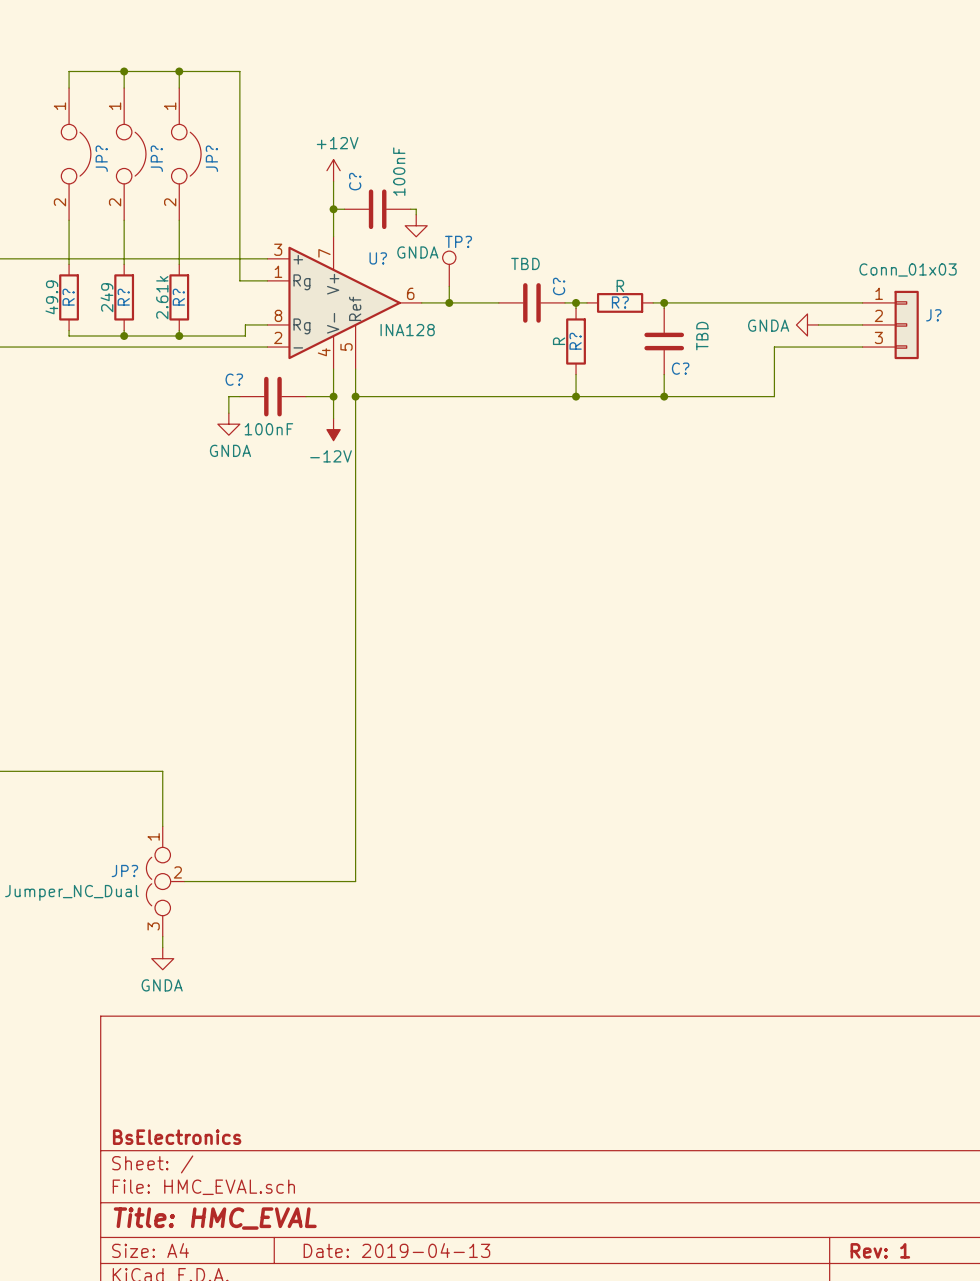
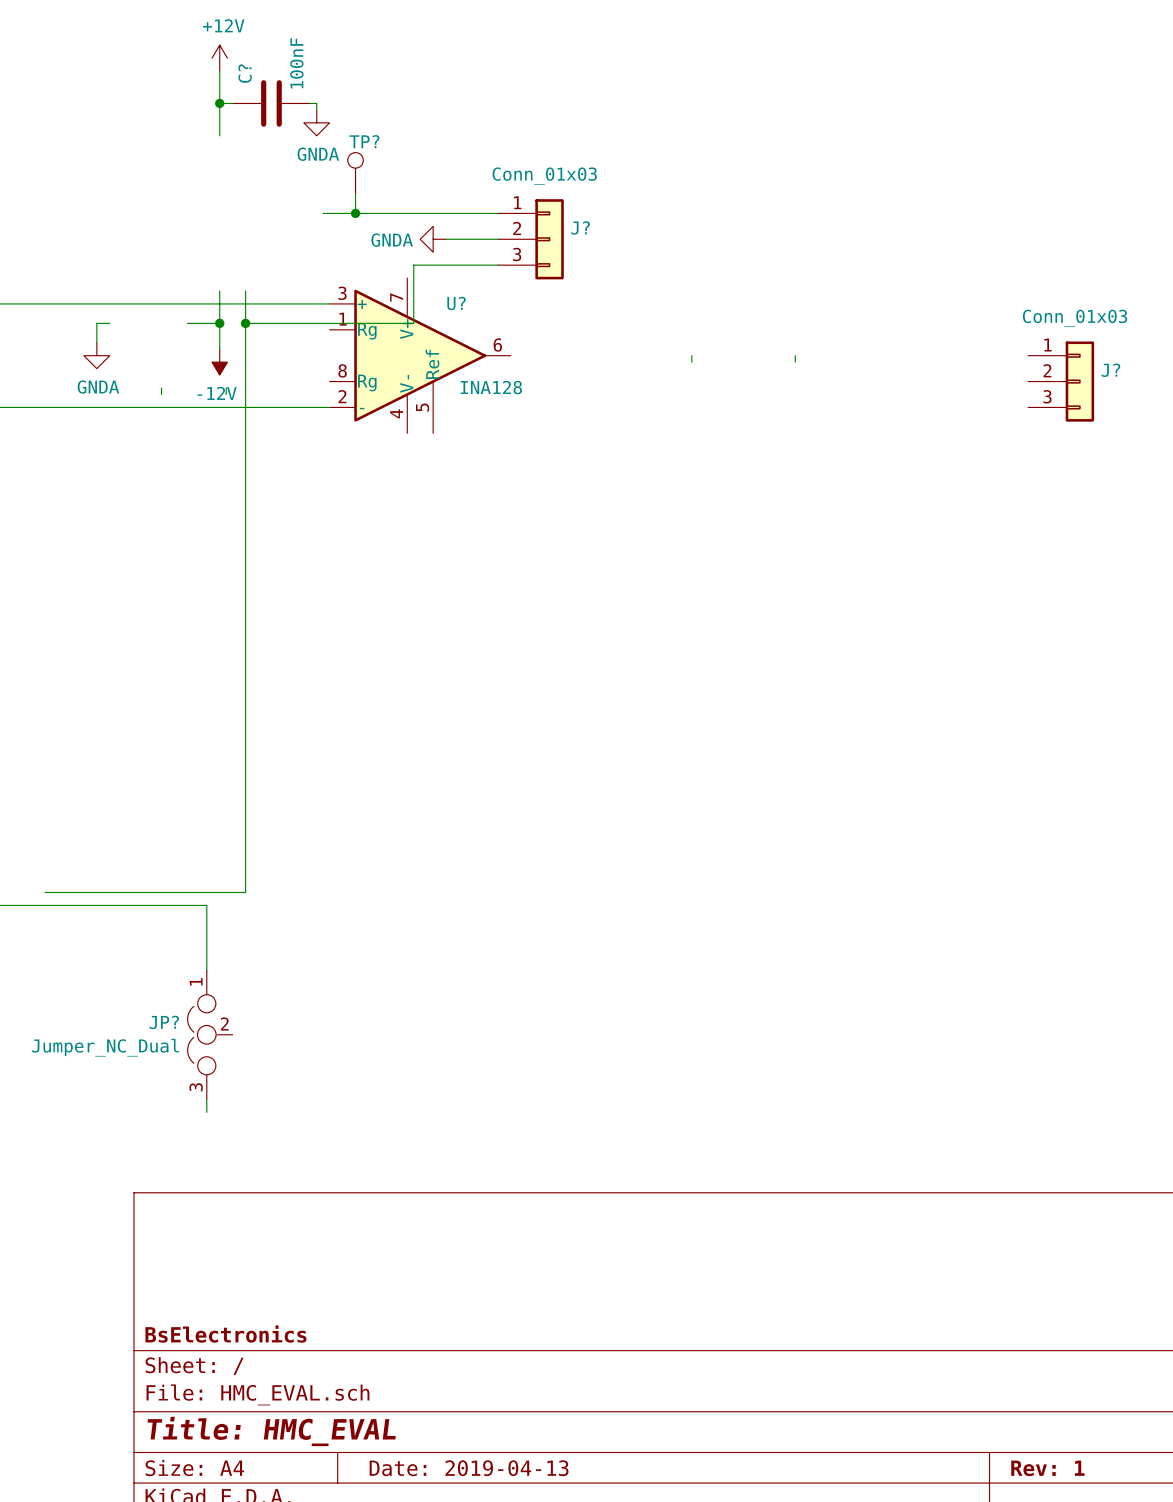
wire: (124, 71) (124, 88) -> none
junction: (124, 71) -> none
wire: (179, 71) (179, 88) -> none
junction position: (179, 71) -> (219, 103)
wire: (69, 88) (69, 71) (239, 71) (239, 280) (267, 280) -> none
C?: none -> 100nF (271, 103)
power symbol: none -> GNDA (316, 122)
TP?: none -> (355, 173)
JP?: (76, 154) -> none
JP?: (131, 154) -> none
JP?: (186, 154) -> none
power symbol position: +12V (333, 170) -> +12V (219, 58)
wire: none -> (323, 213) (497, 213)
wire: (333, 181) (333, 236) -> (219, 71) (219, 135)
wire: none -> (446, 239) (497, 239)
J?: none -> Conn_01x03 (530, 239)
wire: (333, 209) (344, 209) -> (219, 103) (232, 103)
junction position: (333, 209) -> (355, 213)
C?: 100nF (377, 209) -> none
wire: (410, 209) (416, 209) (416, 214) -> (310, 103) (316, 103) (316, 109)
wire: (69, 220) (69, 264) -> none
wire: (124, 220) (124, 264) -> none
wire: (179, 220) (179, 264) -> none
wire: none -> (497, 265) (413, 265) (413, 323) (245, 323)
power symbol rotation: 0° (416, 225) -> 90° clockwise (433, 239)
power symbol position: GNDA (416, 225) -> GNDA (433, 239)
TP?: (449, 268) -> none
junction: none -> (219, 323)
junction: none -> (245, 323)
wire: (449, 286) (449, 302) -> (355, 194) (355, 213)
R?: 49.9 (69, 297) -> none
R?: 249 (124, 297) -> none
R?: 2.61k (179, 297) -> none
power symbol: none -> GNDA (96, 355)
wire: (421, 302) (498, 302) -> none
junction: (449, 302) -> none
C?: TBD (531, 302) -> none
wire: (565, 302) (587, 302) -> none
junction: (576, 302) -> none
R?: R (620, 302) -> none
wire: (653, 302) (862, 302) -> none
junction: (664, 302) -> none
wire: (267, 324) (245, 324) (245, 336) (69, 336) (69, 330) -> none
power symbol: GNDA (807, 324) -> none
wire: (818, 324) (862, 324) -> none
junction: (124, 336) -> none
junction: (179, 336) -> none
R?: R (576, 341) -> none
C?: TBD (664, 341) -> none
wire: (862, 347) (774, 347) (774, 396) (355, 396) -> none
wire: (333, 369) (333, 418) -> (219, 291) (219, 349)
wire: (355, 369) (355, 881) (184, 881) -> (245, 291) (245, 892) (45, 892)
wire: (576, 374) (576, 396) -> none
wire: (664, 374) (664, 396) -> none
wire: (239, 396) (228, 396) (228, 413) -> (109, 323) (96, 323) (96, 342)
C?: 100nF (272, 396) -> none
wire: (306, 396) (333, 396) -> (187, 323) (219, 323)
junction: (333, 396) -> none
junction: (355, 396) -> none
junction: (576, 396) -> none
junction: (664, 396) -> none
power symbol: GNDA (228, 424) -> none
power symbol position: -12V (333, 429) -> -12V (219, 362)
power symbol: GNDA (162, 958) -> none

